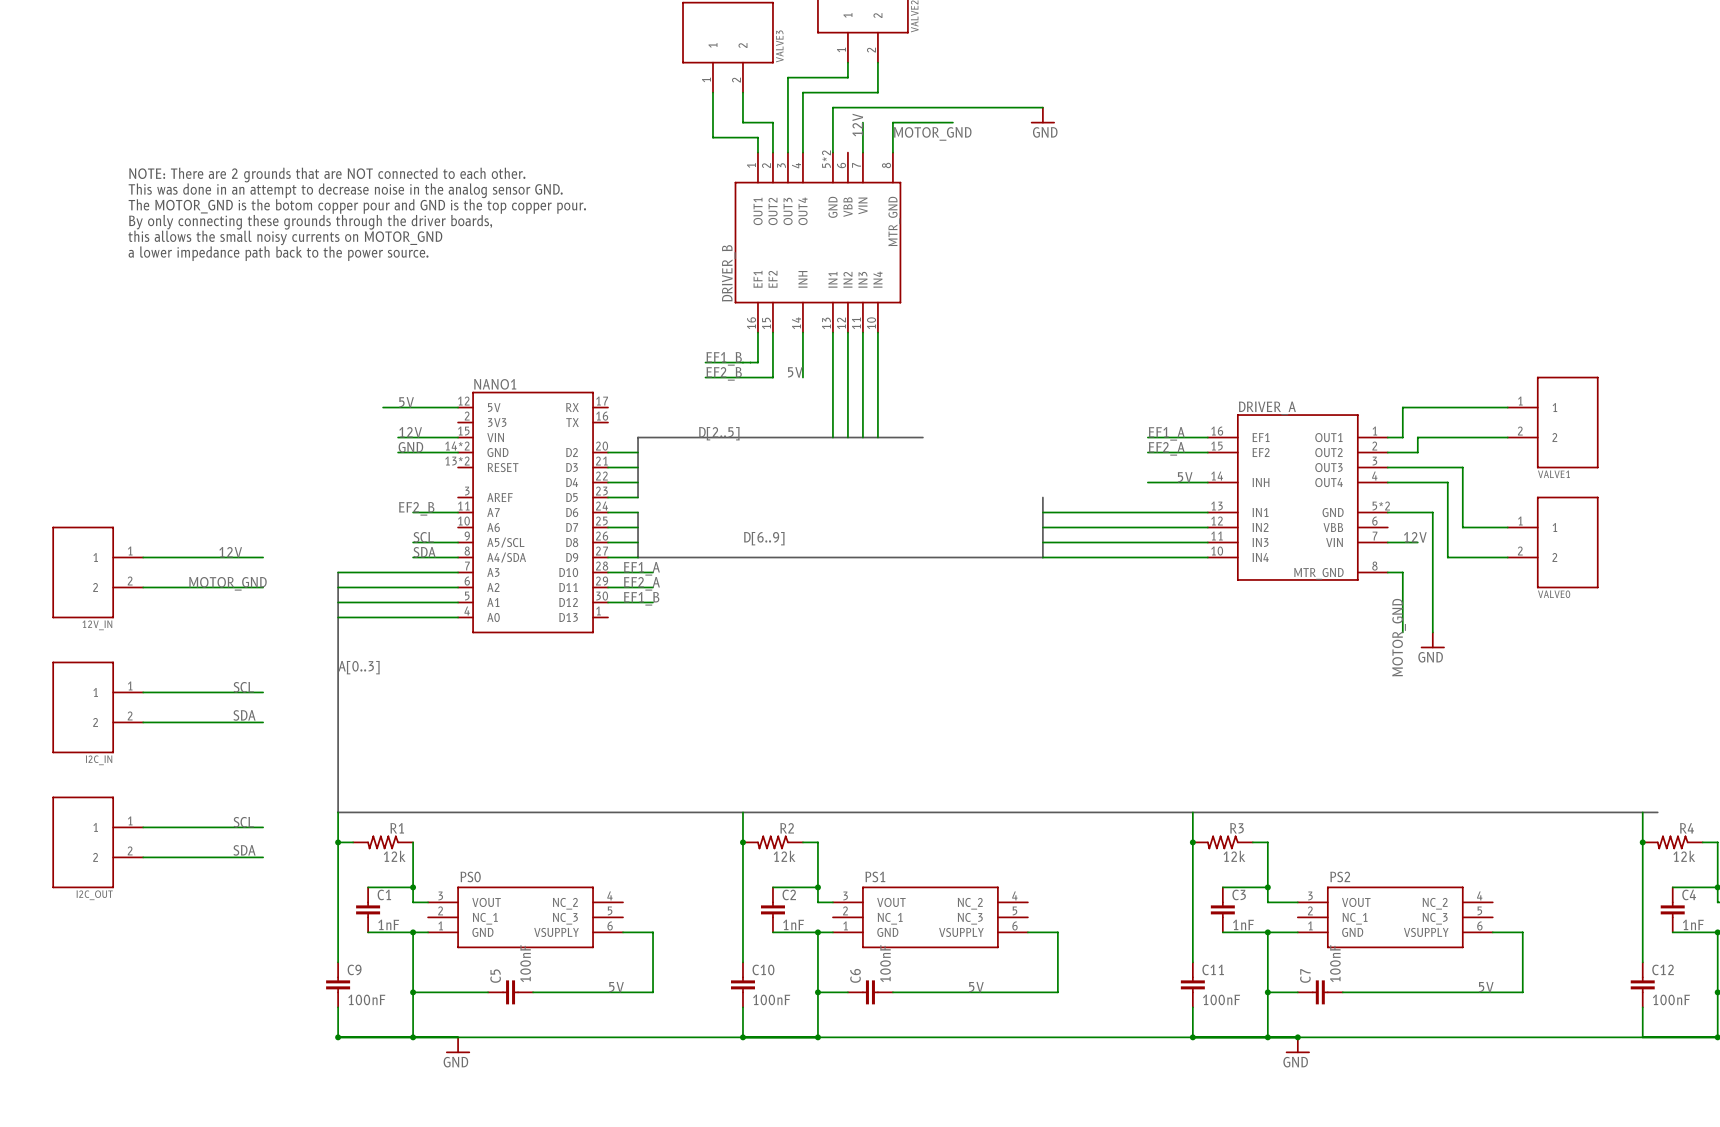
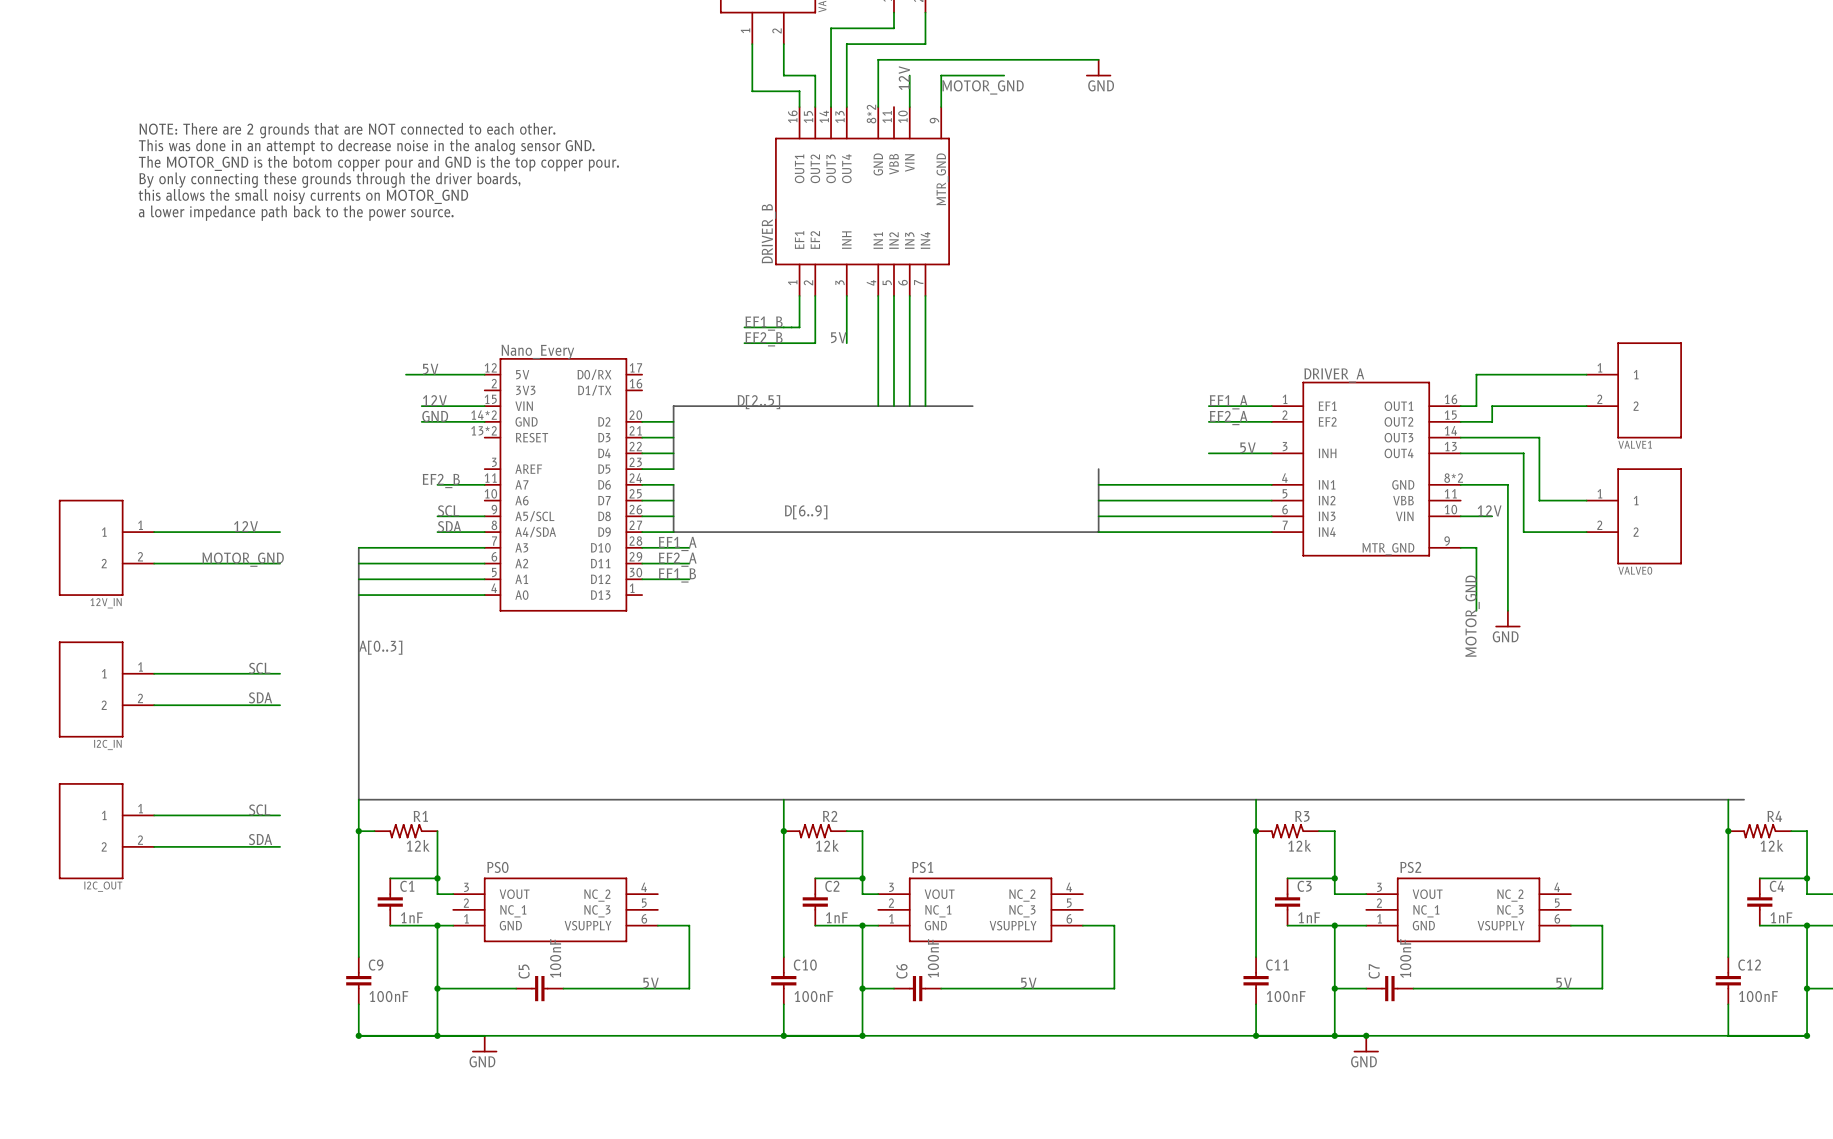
DRIVER_B symbol: [734, 152, 902, 333] -> [775, 107, 950, 296]
NANO1 name: NANO1 (495, 384) -> none
NANO1 text: none -> Nano_Every (537, 351)
NANO1 pin name: RX (572, 407) -> D0/RX (594, 374)
DRIVER_A symbol: [1207, 414, 1388, 581] -> [1271, 381, 1461, 557]
NANO1 pin name: TX (572, 422) -> D1/TX (594, 390)

